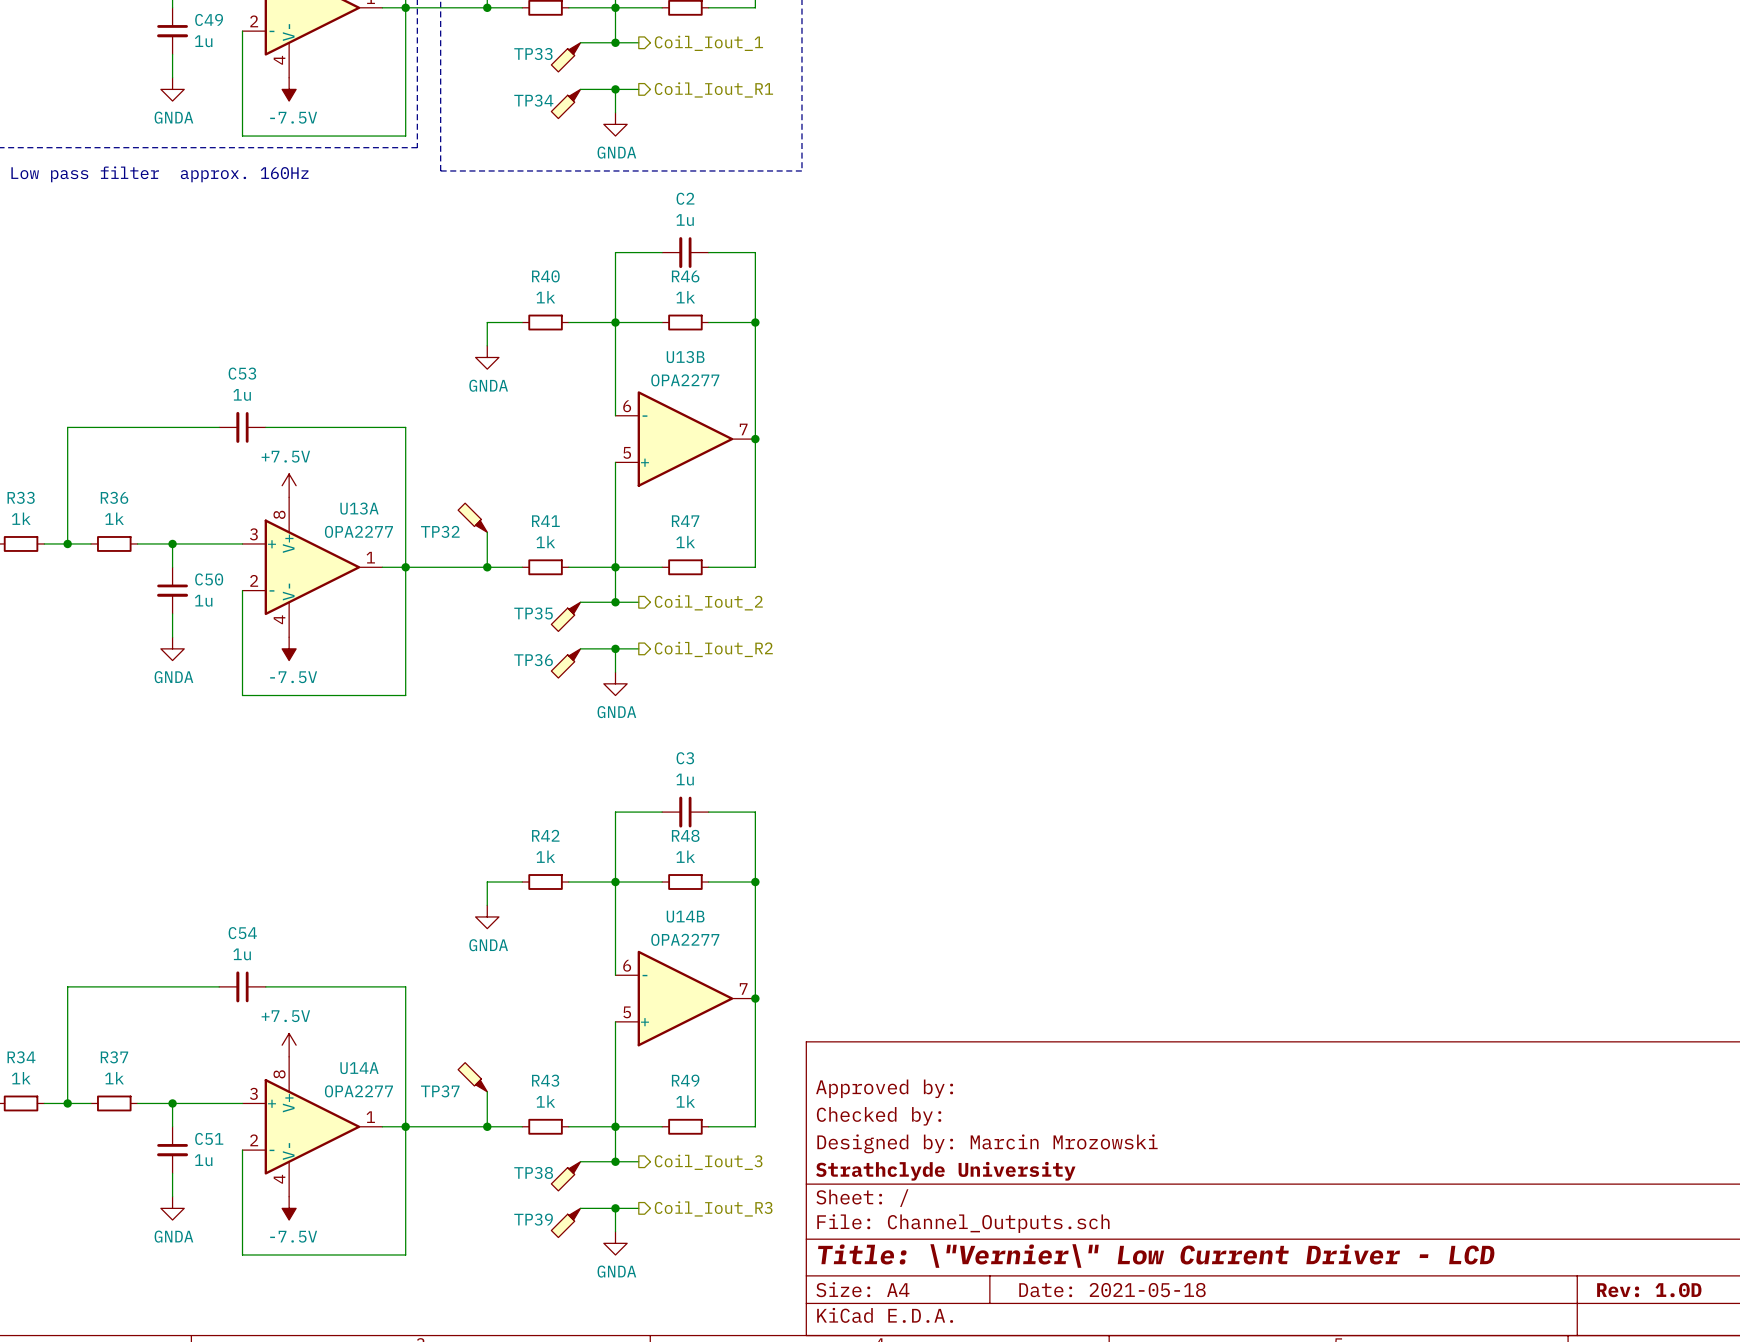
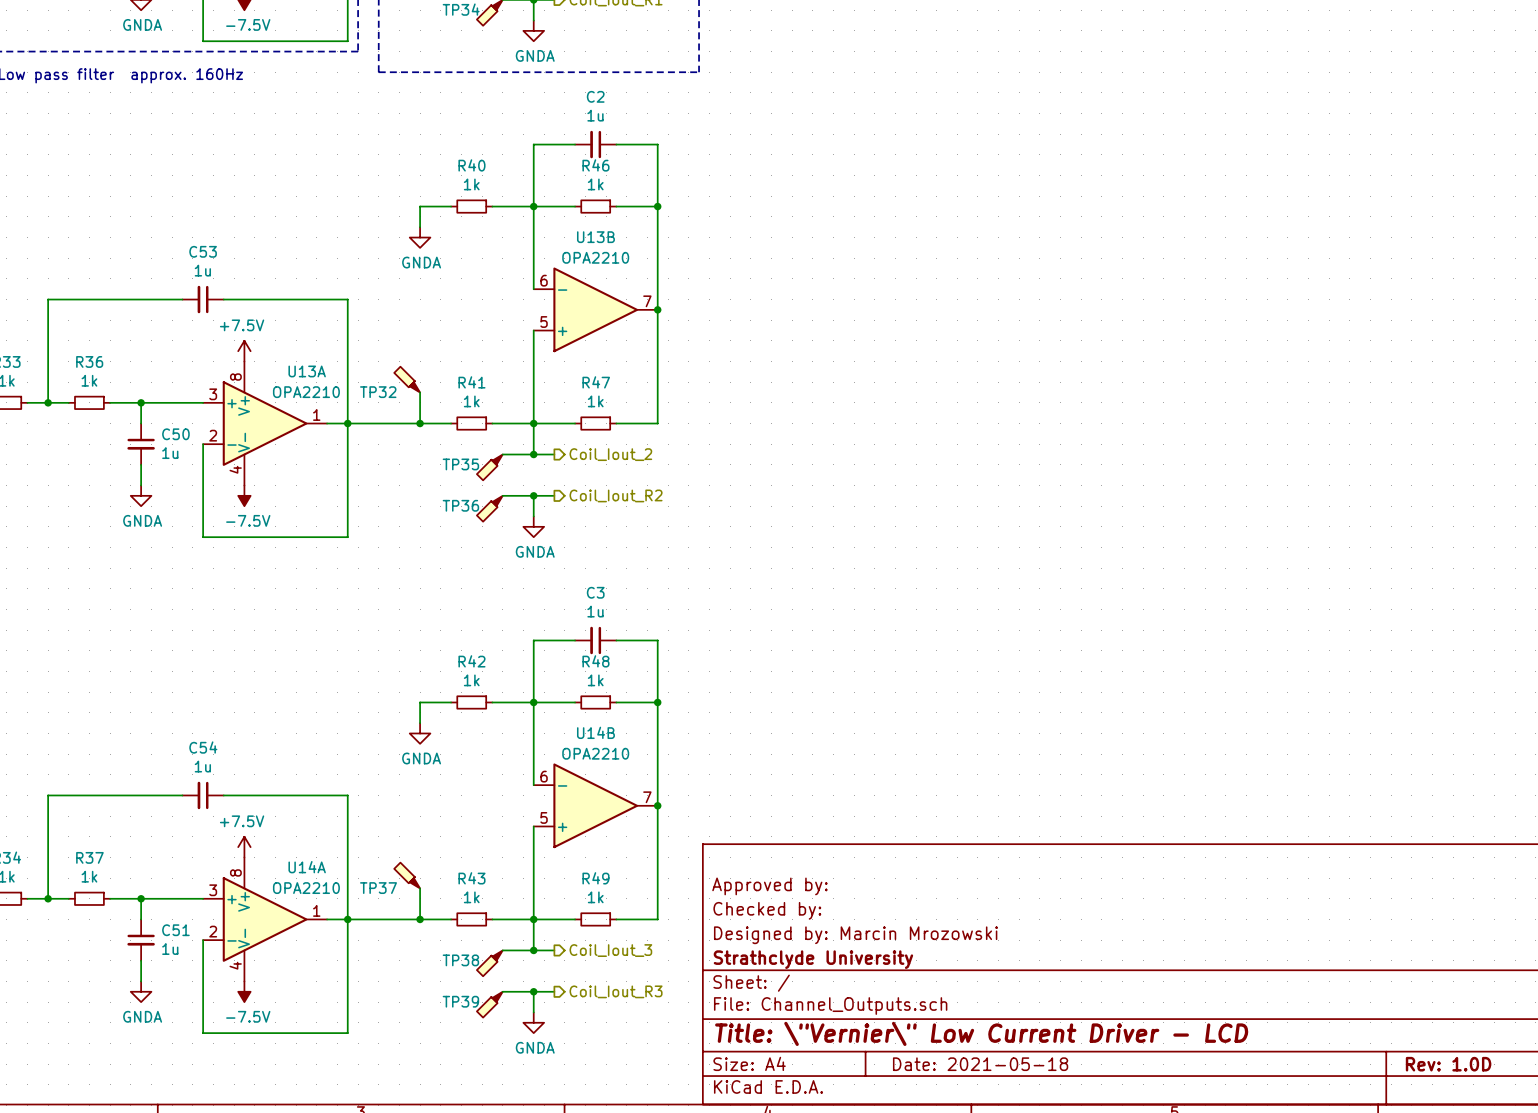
U13B value: OPA2277 (685, 380) -> OPA2210 (595, 257)
U13A value: OPA2277 (358, 531) -> OPA2210 (306, 392)
U14B value: OPA2277 (685, 939) -> OPA2210 (595, 753)
U14A value: OPA2277 (358, 1091) -> OPA2210 (306, 888)

